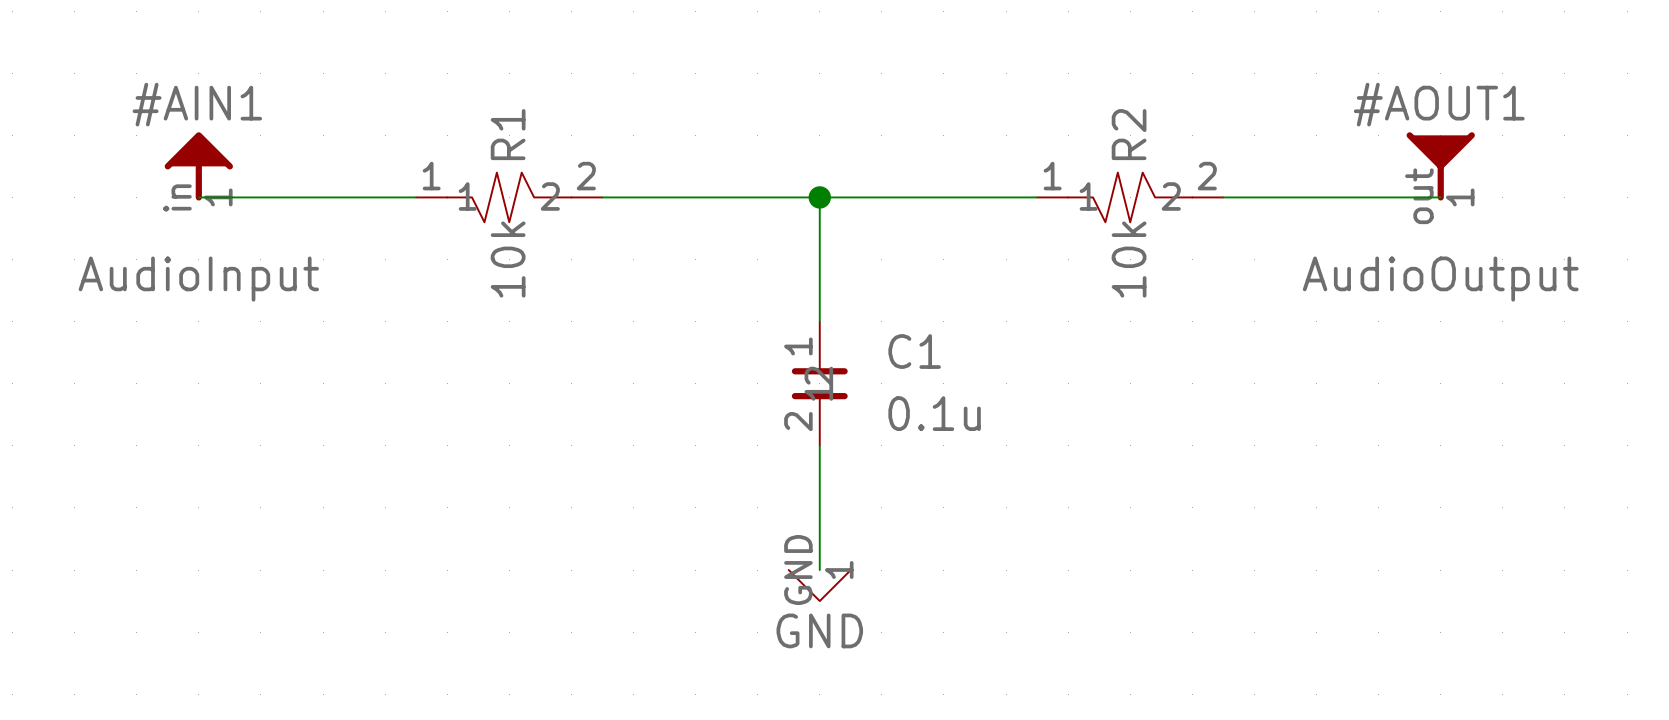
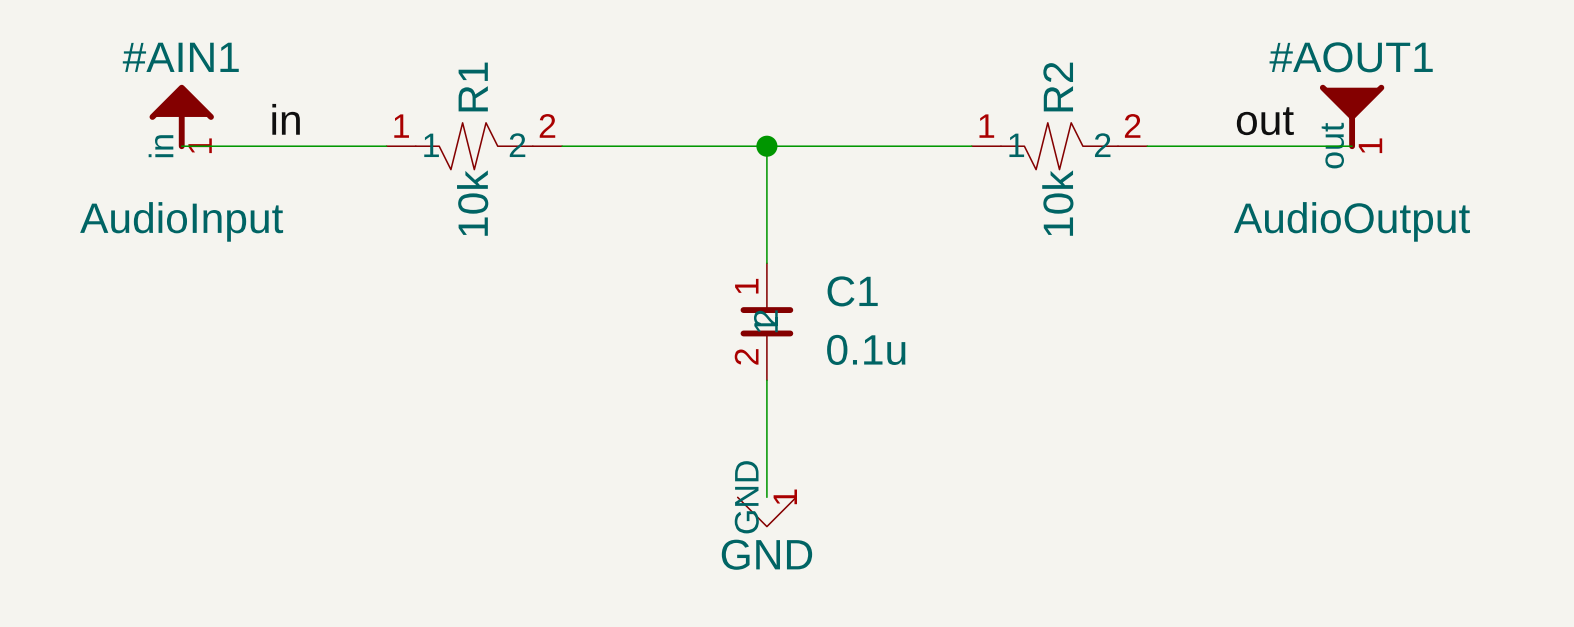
label: none -> in (286, 119)
label: none -> out (1265, 121)

